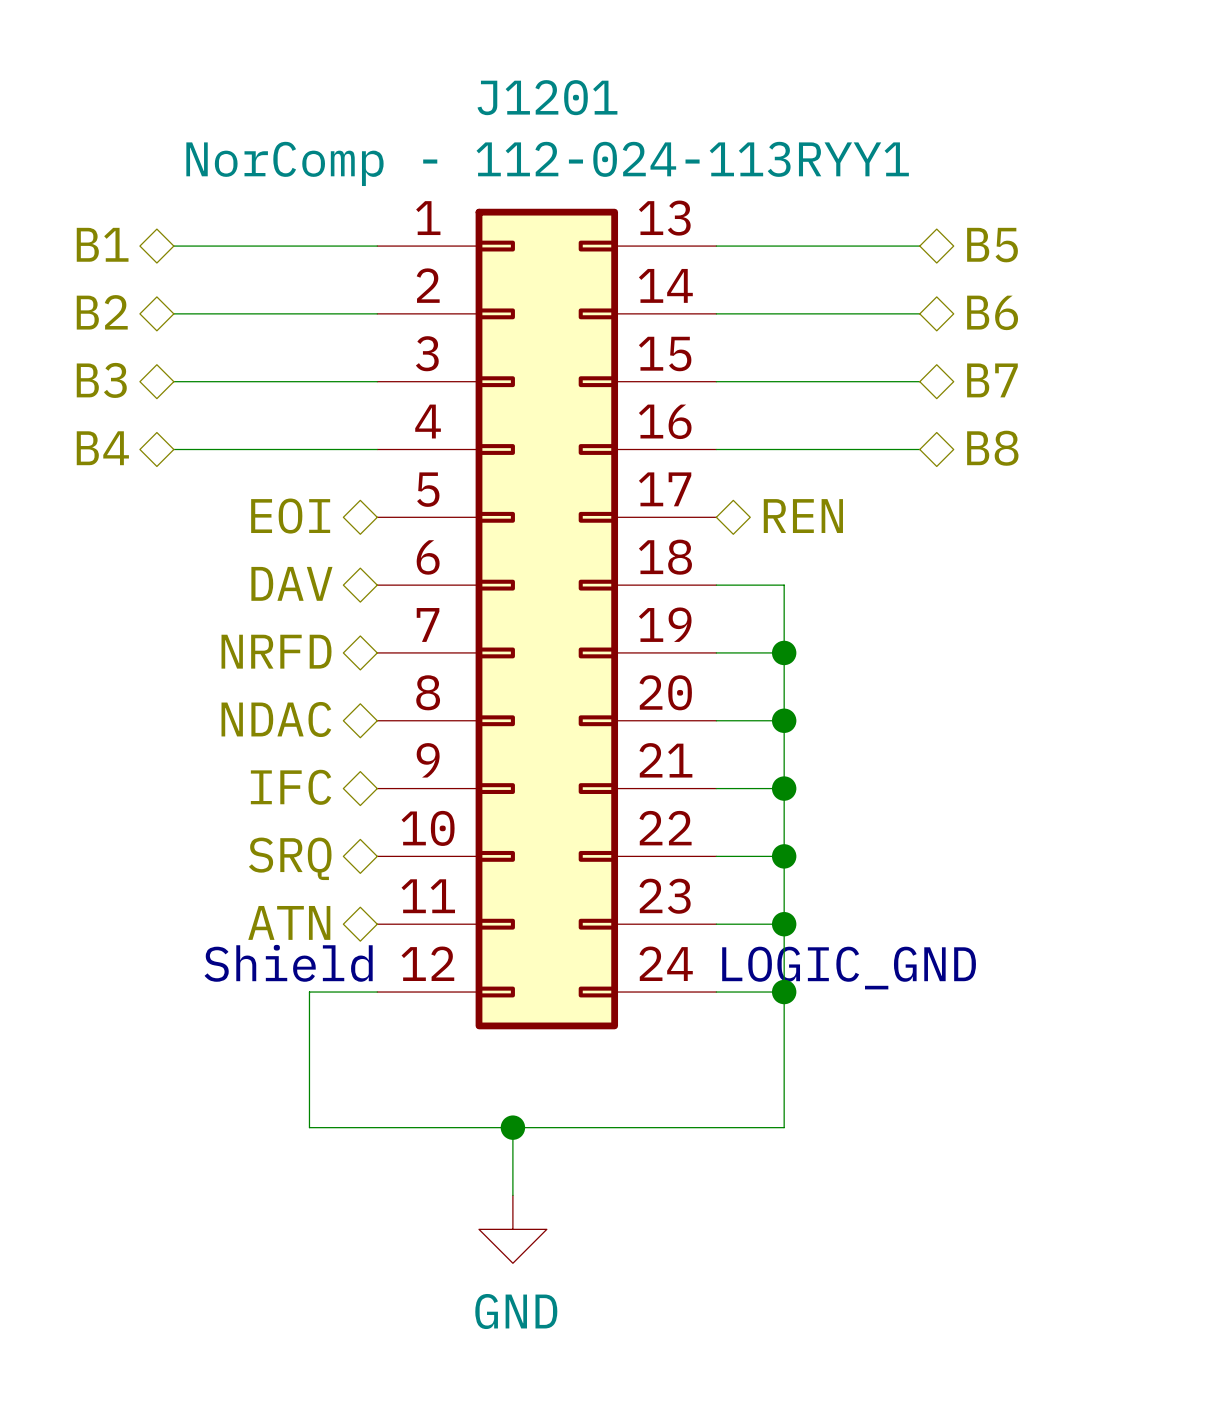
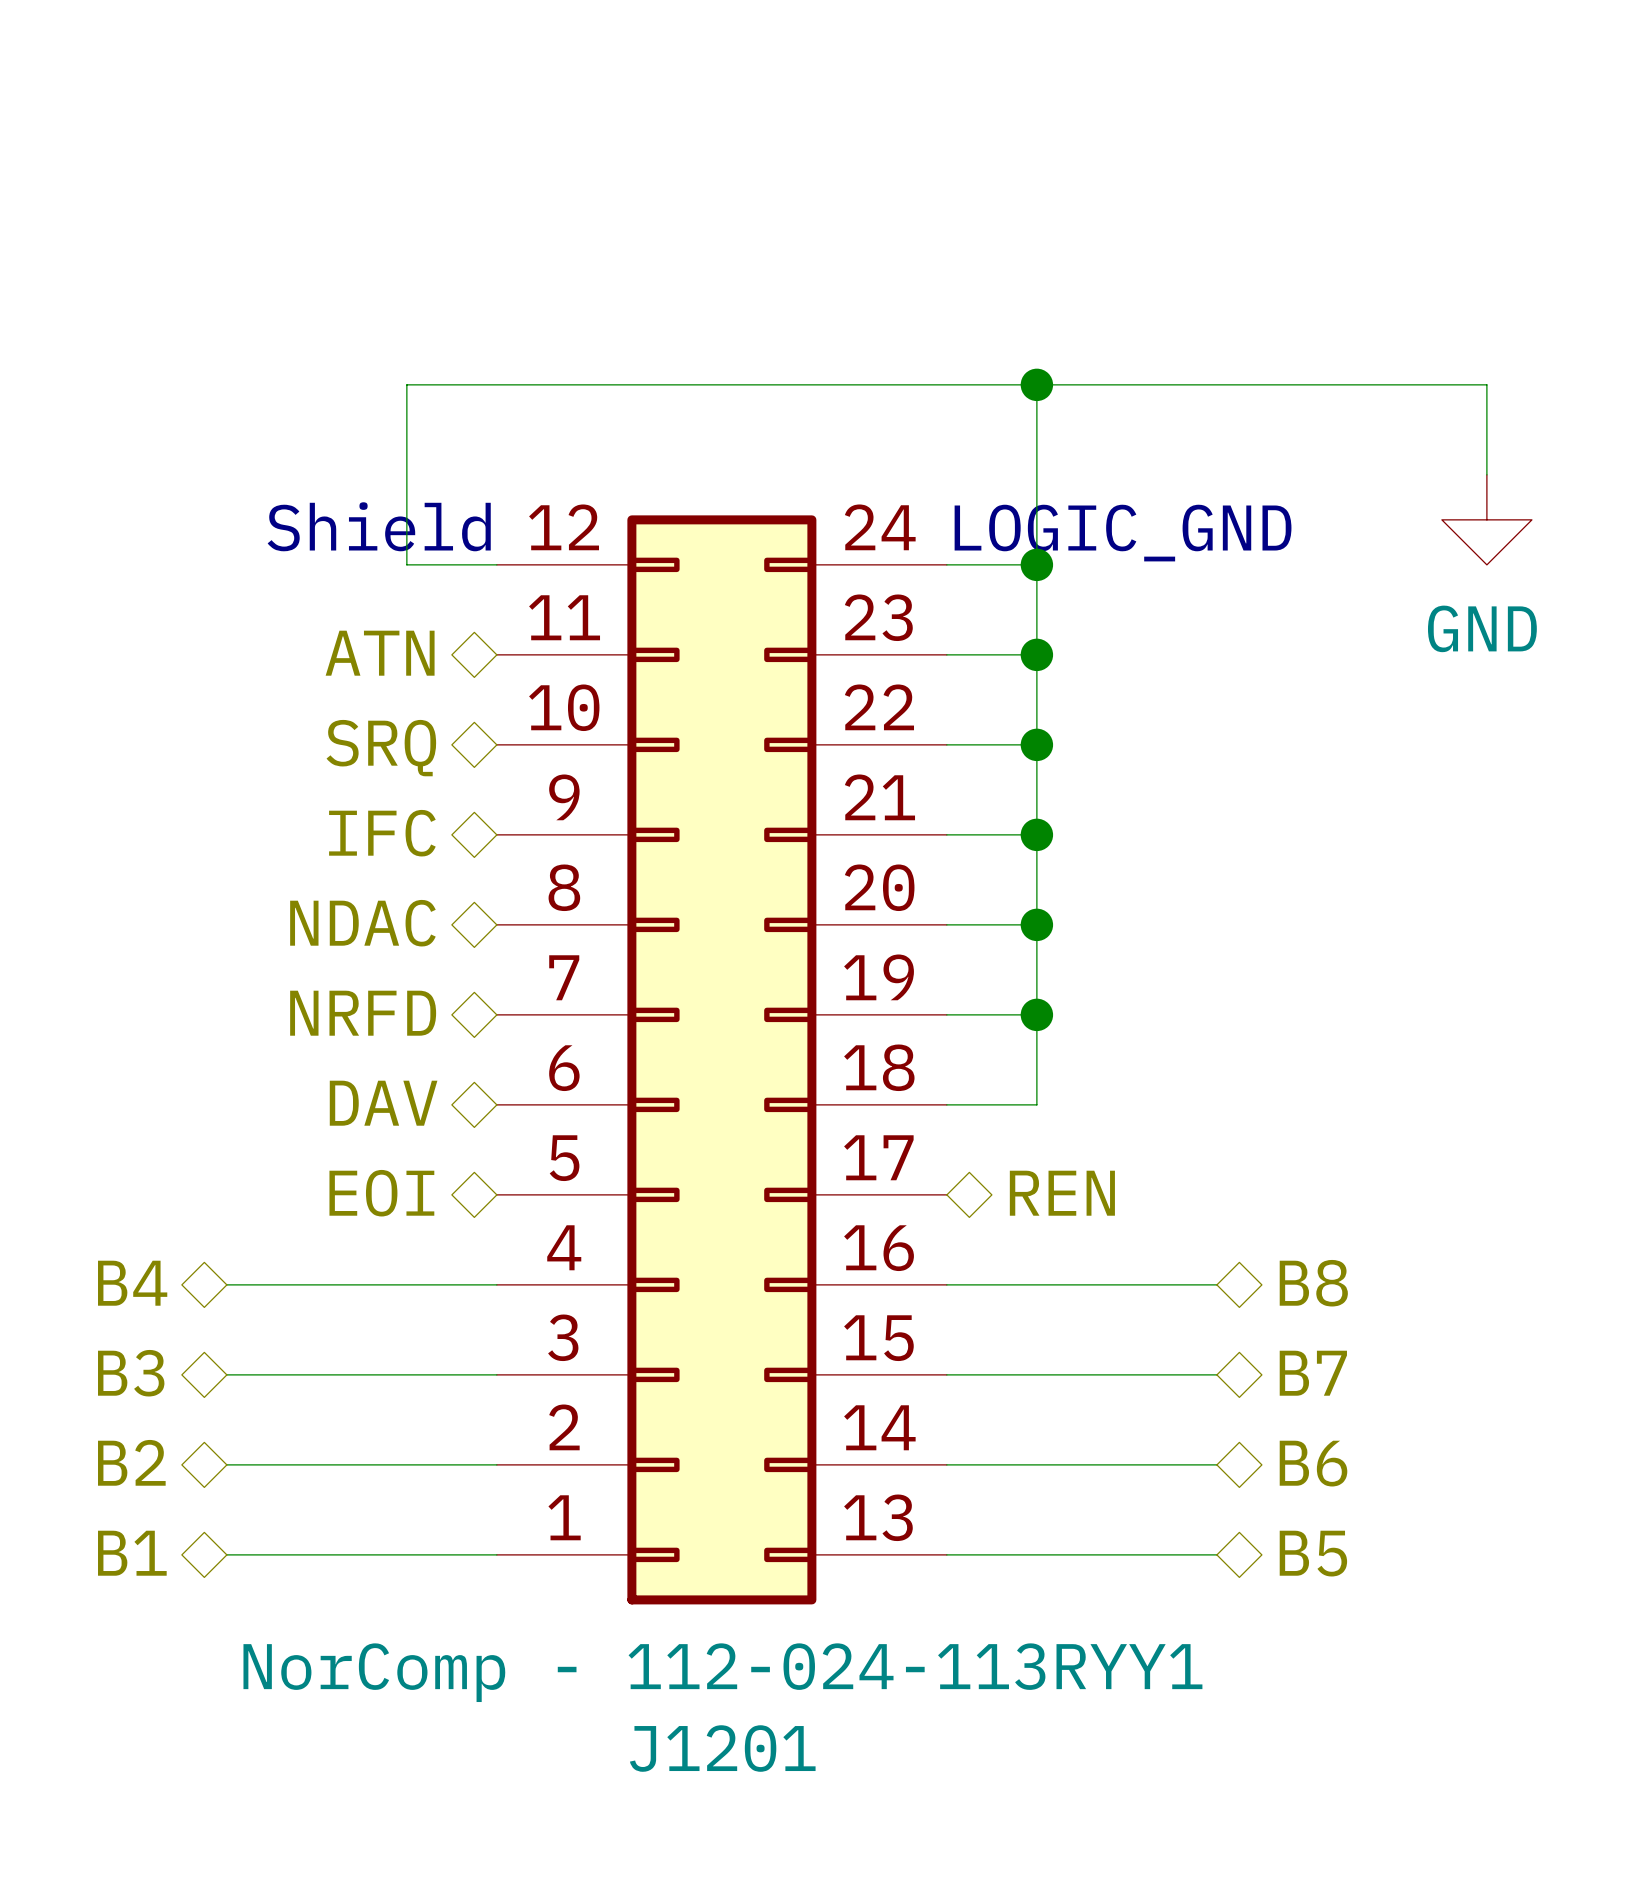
hierarchical label: B1 (102, 244) -> none
hierarchical label: B5 (992, 245) -> none
wire: (173, 246) (377, 246) -> none
wire: (716, 246) (919, 246) -> none
hierarchical label: B2 (102, 312) -> none
hierarchical label: B6 (992, 312) -> none
wire: (173, 313) (309, 313) -> (406, 564) (406, 384)
wire: none -> (1036, 384) (1036, 744)
junction: none -> (1036, 384)
wire: none -> (1216, 384) (1486, 384) (1486, 474)
hierarchical label: B3 (101, 380) -> none
hierarchical label: B7 (992, 380) -> none
wire: (173, 381) (377, 381) -> none
wire: (716, 381) (919, 381) -> none
power symbol: none -> GND (1486, 519)
hierarchical label position: B4 (102, 448) -> B4 (132, 1283)
hierarchical label position: B8 (992, 448) -> B8 (1313, 1283)
wire: (173, 449) (309, 449) -> none
wire: (784, 449) (919, 449) -> (1036, 1284) (1216, 1284)
junction: none -> (1036, 564)
hierarchical label: EOI (290, 516) -> ATN (380, 653)
hierarchical label position: REN (803, 516) -> REN (1062, 1193)
junction: none -> (1036, 654)
hierarchical label: DAV (291, 583) -> SRQ (381, 748)
junction: none -> (1036, 744)
J1201 flip: as is (546, 619) -> up-down (721, 1059)
hierarchical label: NRFD (276, 651) -> IFC (382, 833)
hierarchical label: IFC (291, 787) -> NRFD (363, 1013)
wire: (784, 856) (784, 1127) -> (1216, 1464) (1036, 1464)
junction: (784, 856) -> none
hierarchical label: SRQ (290, 858) -> DAV (383, 1103)
hierarchical label: ATN (289, 922) -> EOI (381, 1193)
wire: (716, 924) (784, 924) -> (946, 654) (1036, 654)
junction: (784, 924) -> none
text position: Shield (288, 963) -> Shield (379, 526)
text position: LOGIC_GND (849, 968) -> LOGIC_GND (1123, 533)
wire: (309, 992) (309, 1127) -> (406, 1284) (226, 1284)
junction: (784, 992) -> none
hierarchical label: none -> B3 (131, 1373)
hierarchical label: none -> B7 (1313, 1373)
wire: none -> (226, 1374) (496, 1374)
wire: none -> (946, 1374) (1216, 1374)
hierarchical label: none -> B2 (131, 1462)
hierarchical label: none -> B6 (1313, 1463)
wire: none -> (226, 1464) (406, 1464)
junction: (512, 1127) -> none
hierarchical label: none -> B1 (132, 1553)
hierarchical label: none -> B5 (1313, 1553)
wire: none -> (226, 1554) (496, 1554)
wire: none -> (946, 1554) (1216, 1554)
power symbol: GND (512, 1229) -> none

